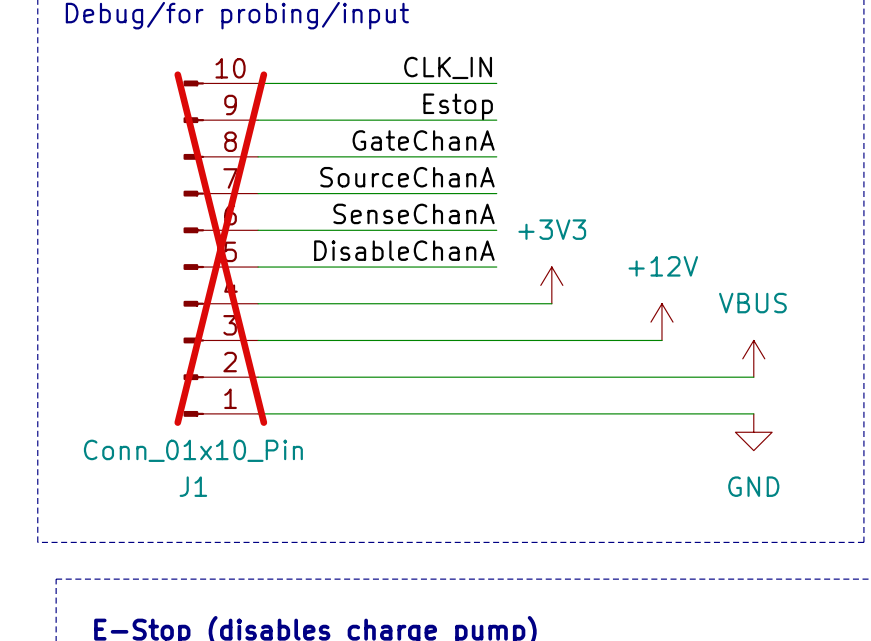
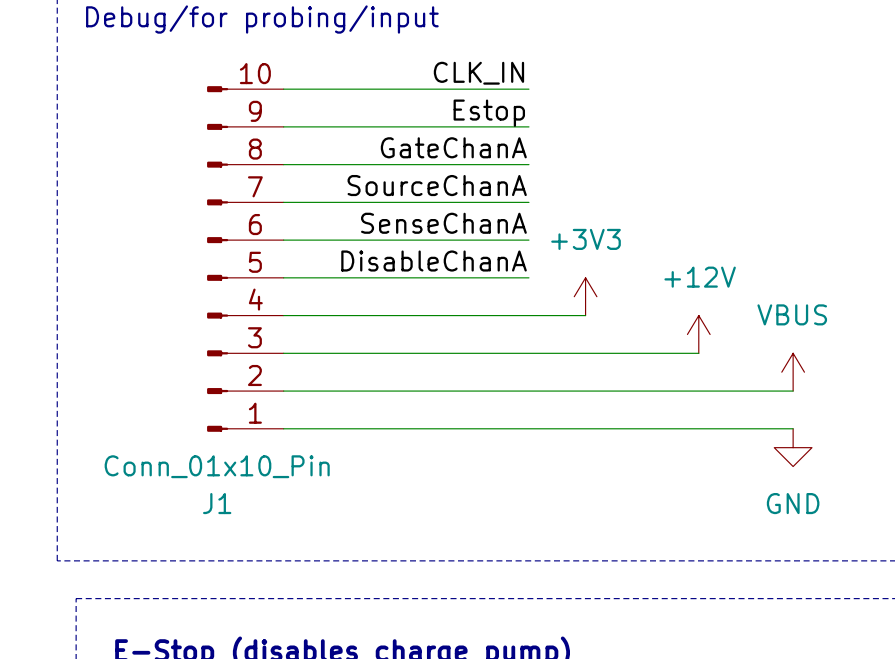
J1 do-not-place cross: (220, 248) -> none

